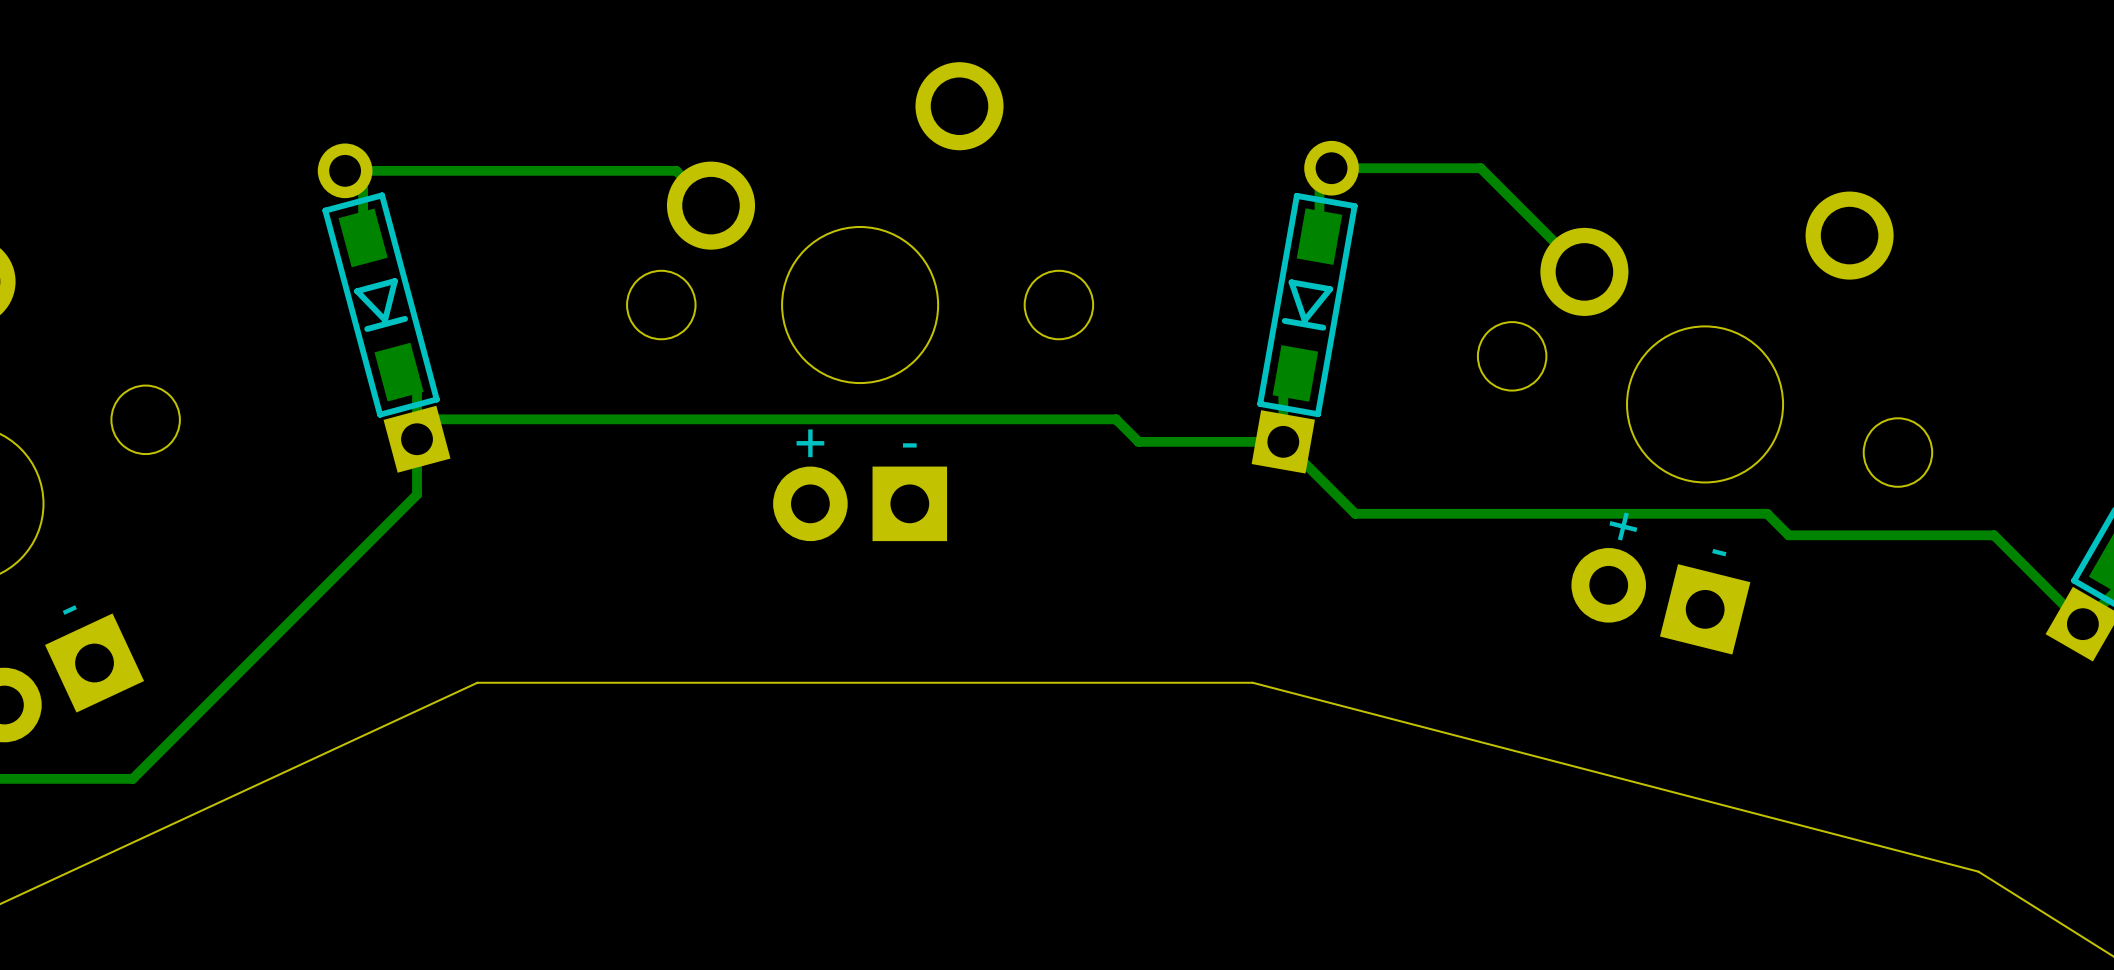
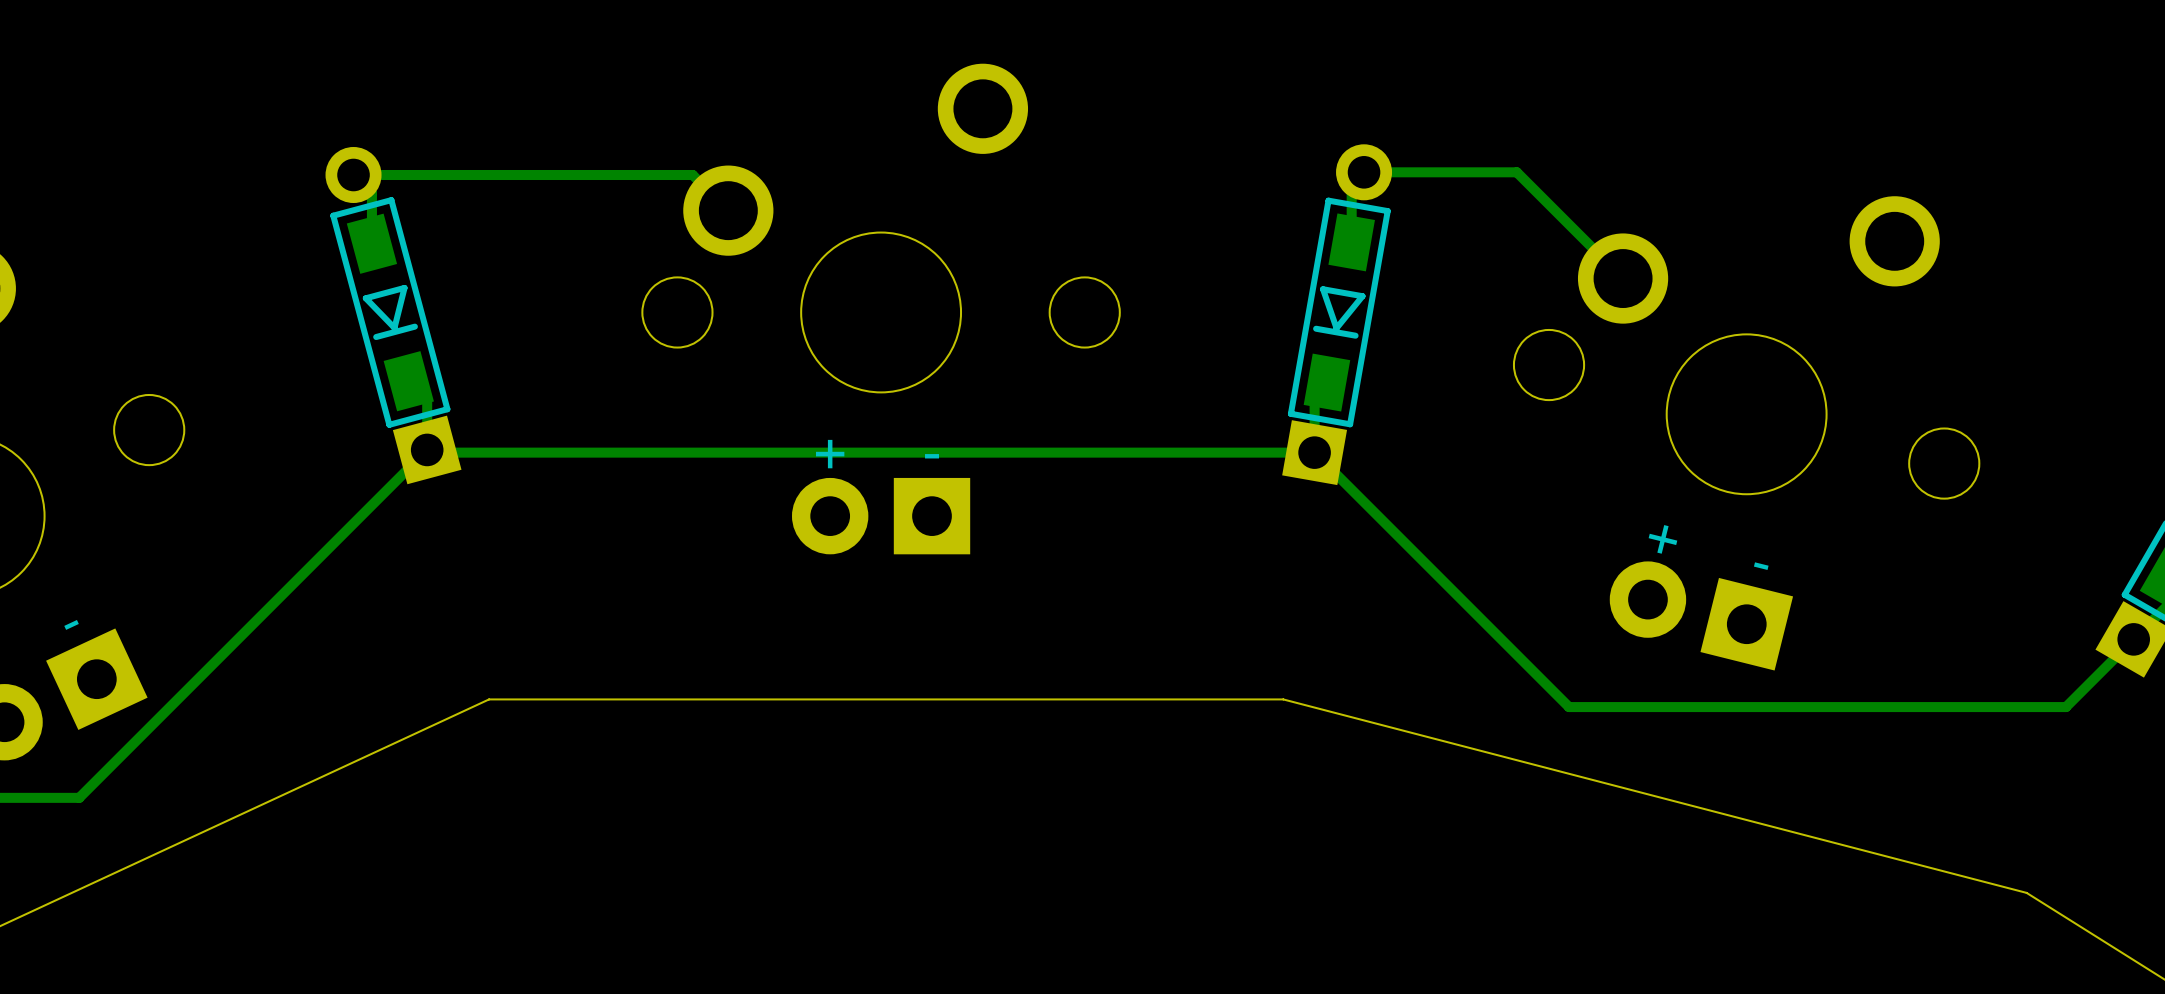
track: (1138, 441) (1116, 419) (436, 419) (417, 439) (417, 494) (132, 778) (77, 778) -> (1166, 452) (429, 452) (427, 449) (79, 797)
track: (1355, 513) (1767, 513) (1788, 535) (1994, 535) (2082, 624) -> (1388, 526) (1569, 707) (2066, 707) (2133, 639)

